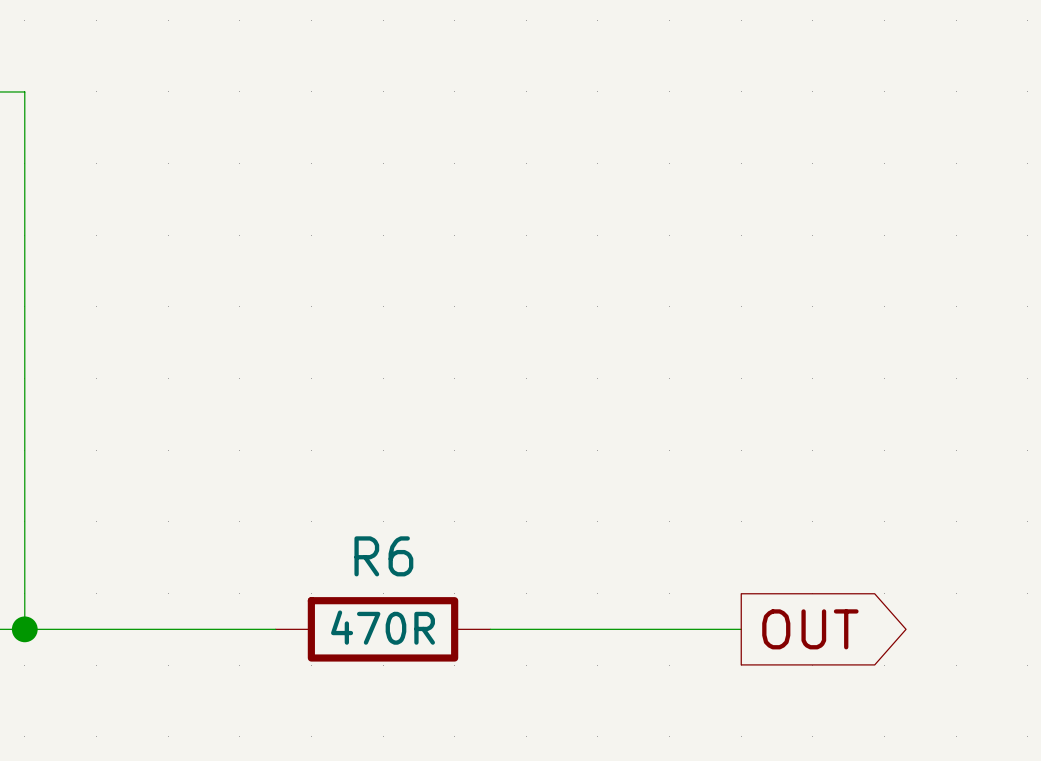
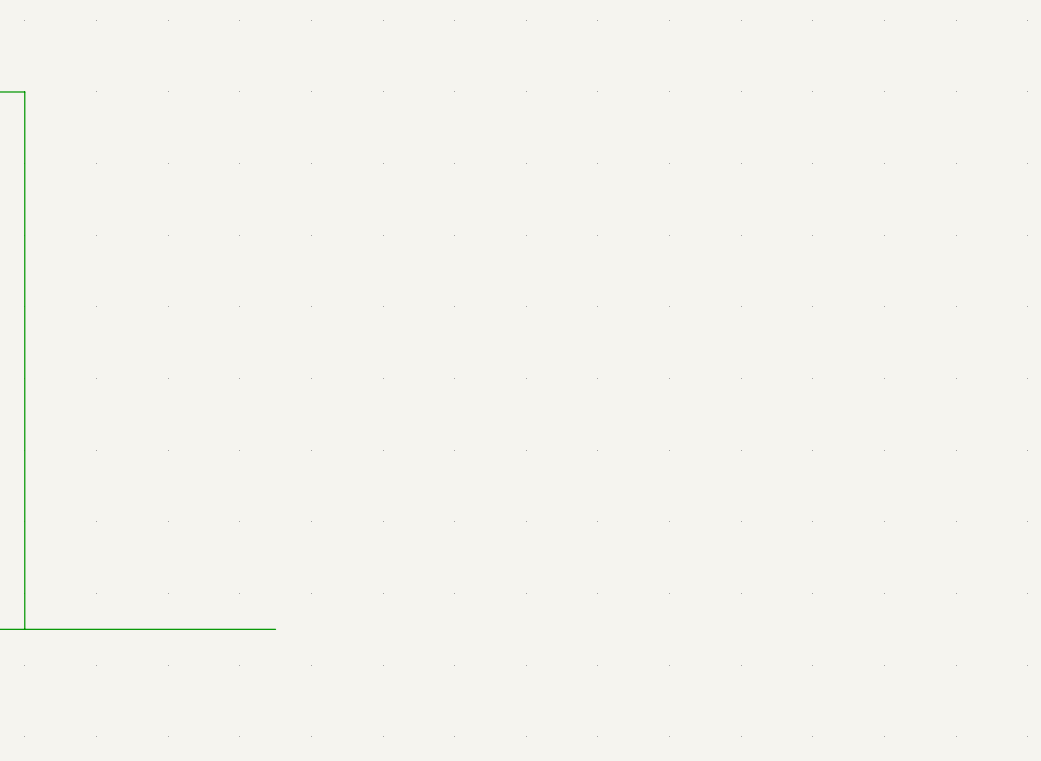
junction: (24, 629) -> none
R6: 470R (383, 629) -> none
wire: (490, 629) (741, 629) -> none
global label: OUT (810, 629) -> none

